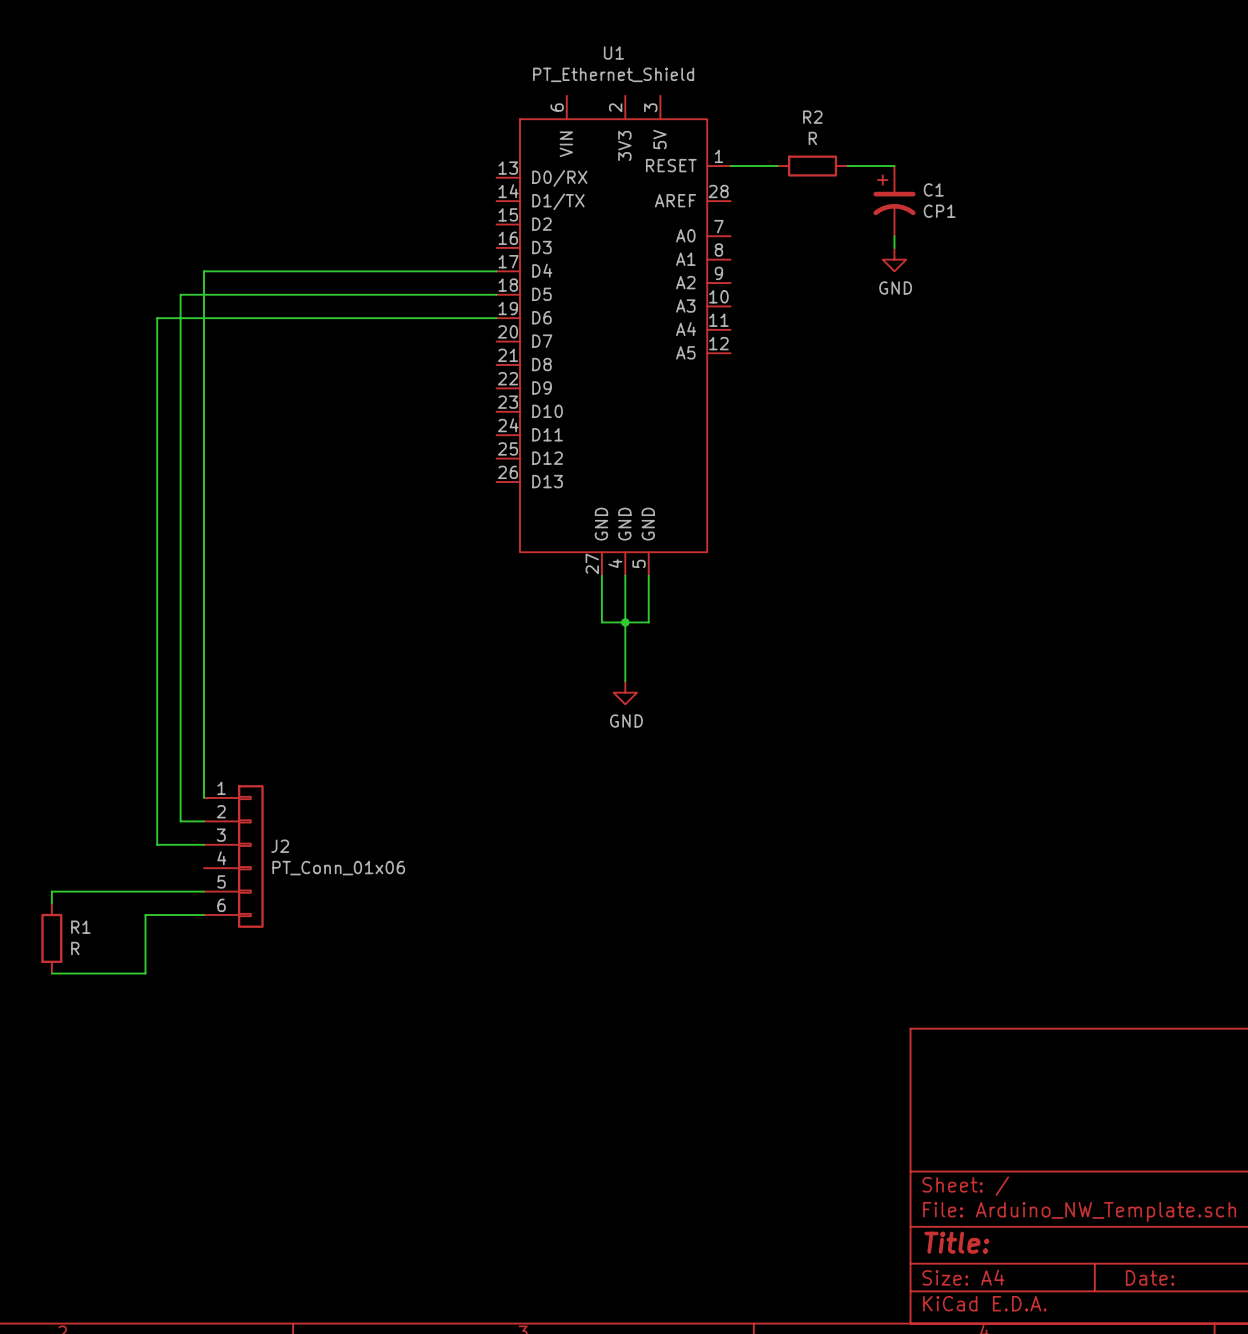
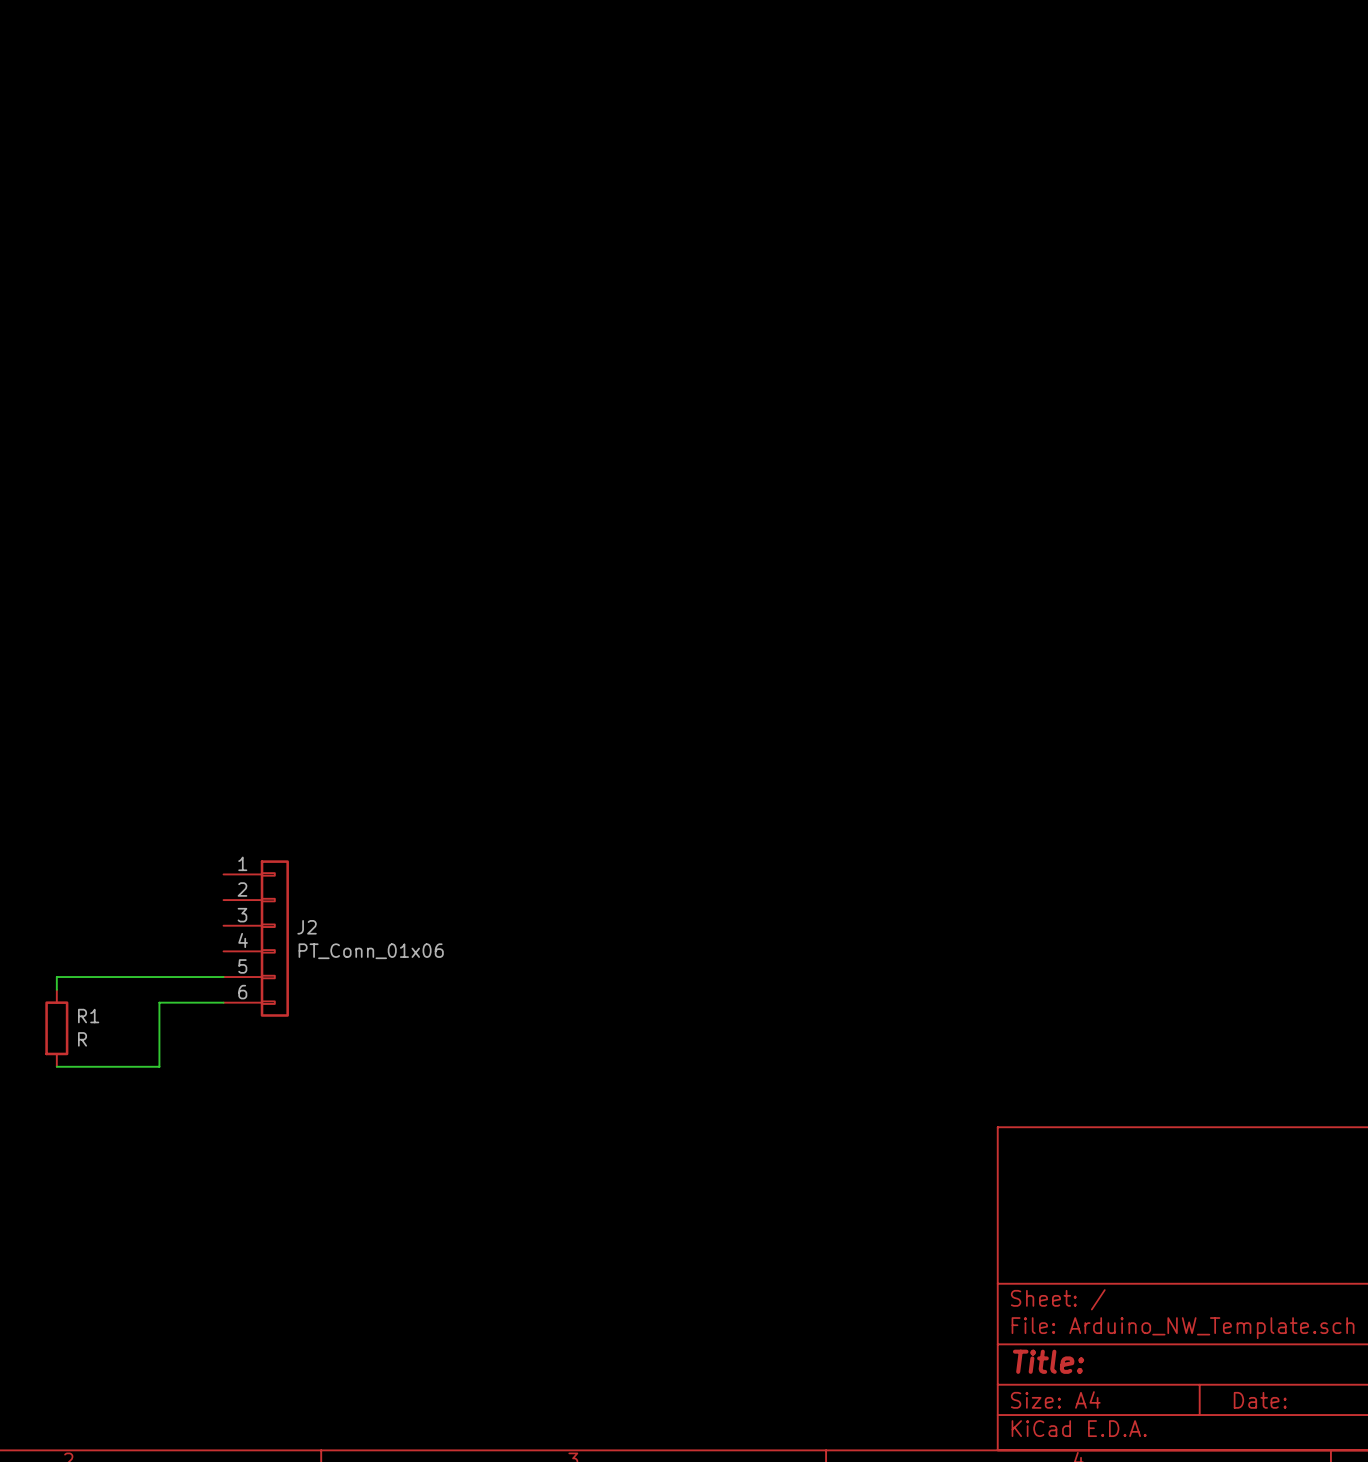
wire: (730, 166) (777, 166) -> none
R2: R (812, 166) -> none
wire: (847, 166) (894, 166) -> none
C1: CP1 (894, 201) -> none
wire: (894, 236) (894, 247) -> none
power symbol: GND (894, 259) -> none
wire: (496, 271) (204, 271) (204, 797) -> none
wire: (496, 294) (180, 294) (180, 821) (204, 821) -> none
wire: (496, 318) (157, 318) (157, 844) (204, 844) -> none
U1: PT_Ethernet_Shield (613, 335) -> none
wire: (601, 575) (601, 622) (648, 622) (648, 575) -> none
wire: (625, 575) (625, 680) -> none
junction: (625, 622) -> none
power symbol: GND (625, 692) -> none

